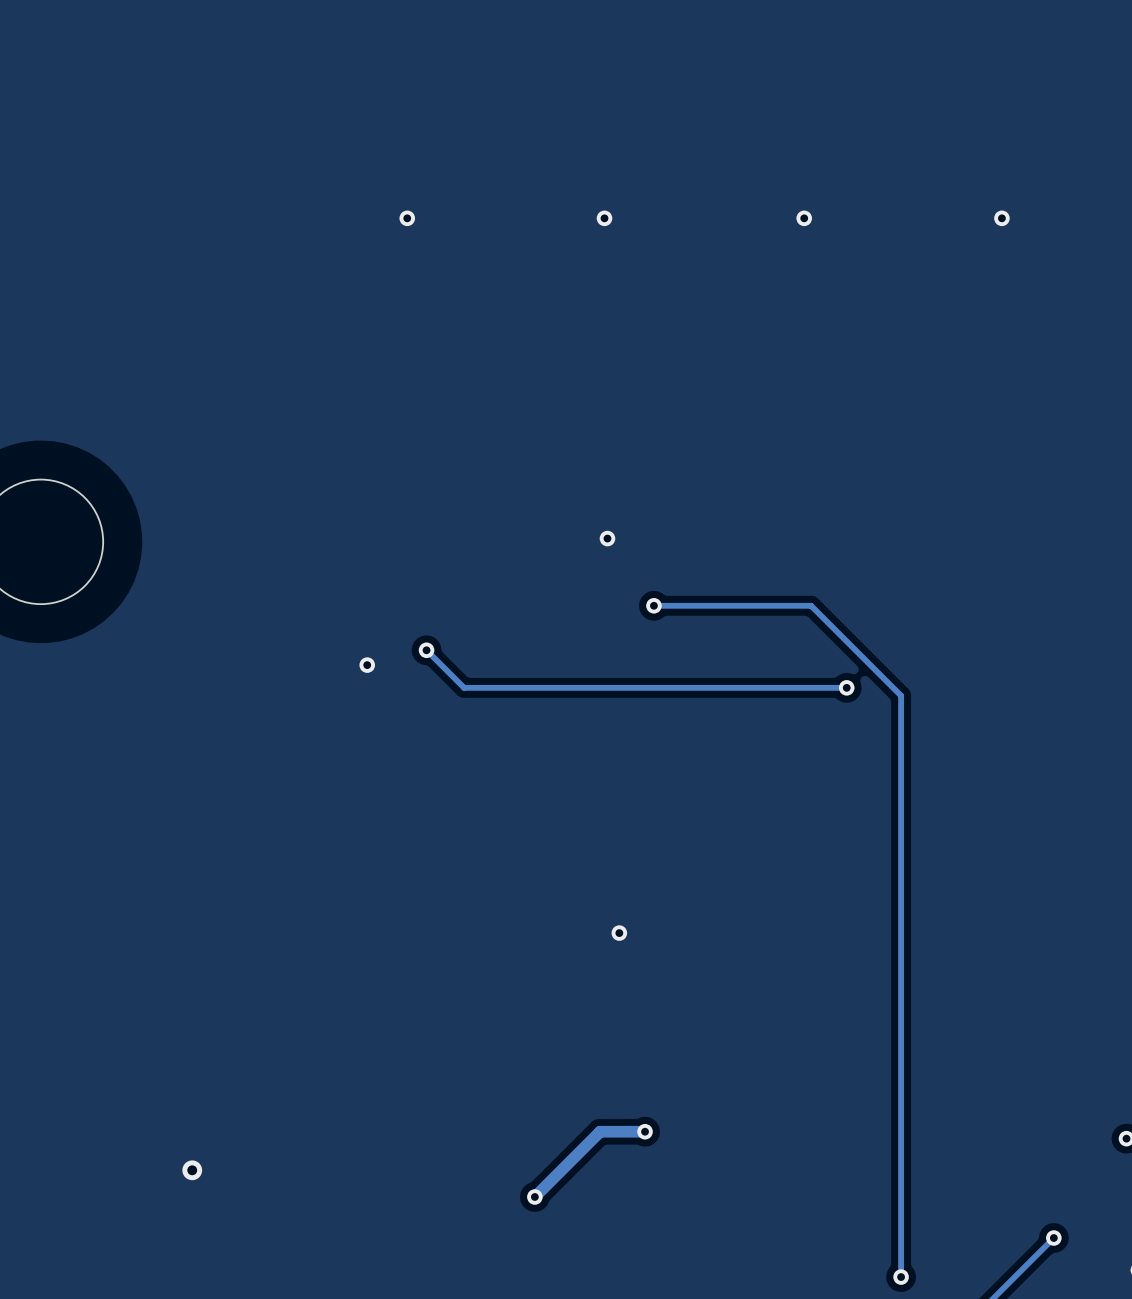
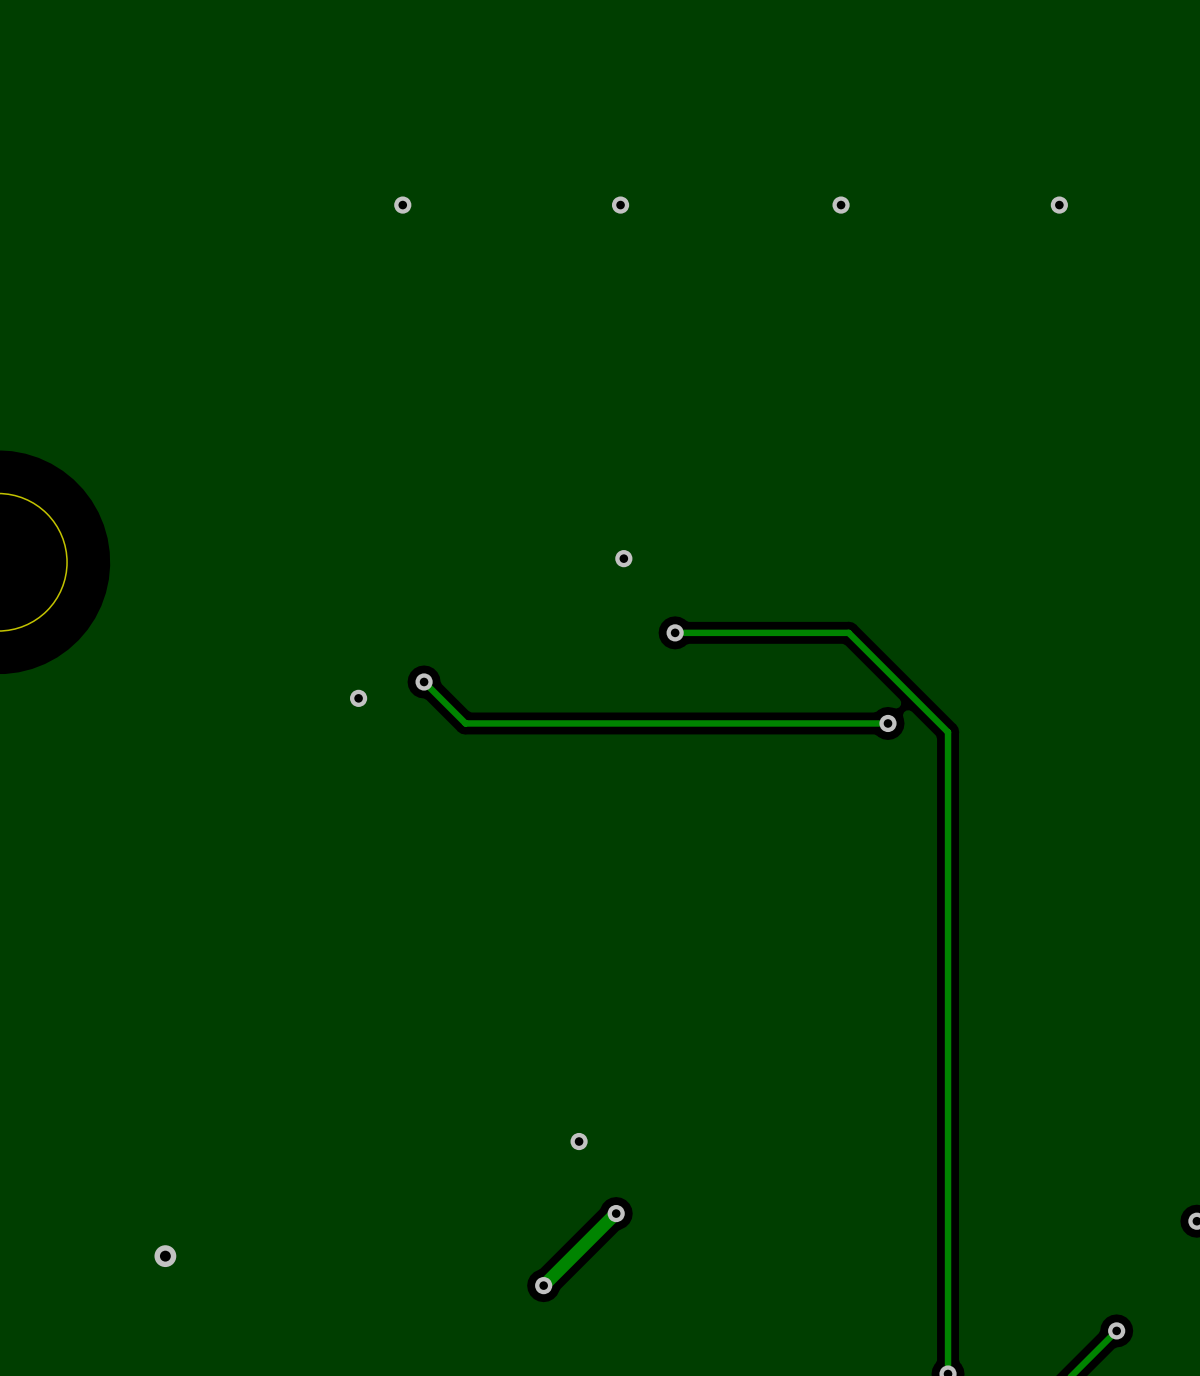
via: (619, 933) -> none
via: none -> (579, 1141)
track: (645, 1131) (600, 1131) -> none
via position: (645, 1131) -> (616, 1213)

